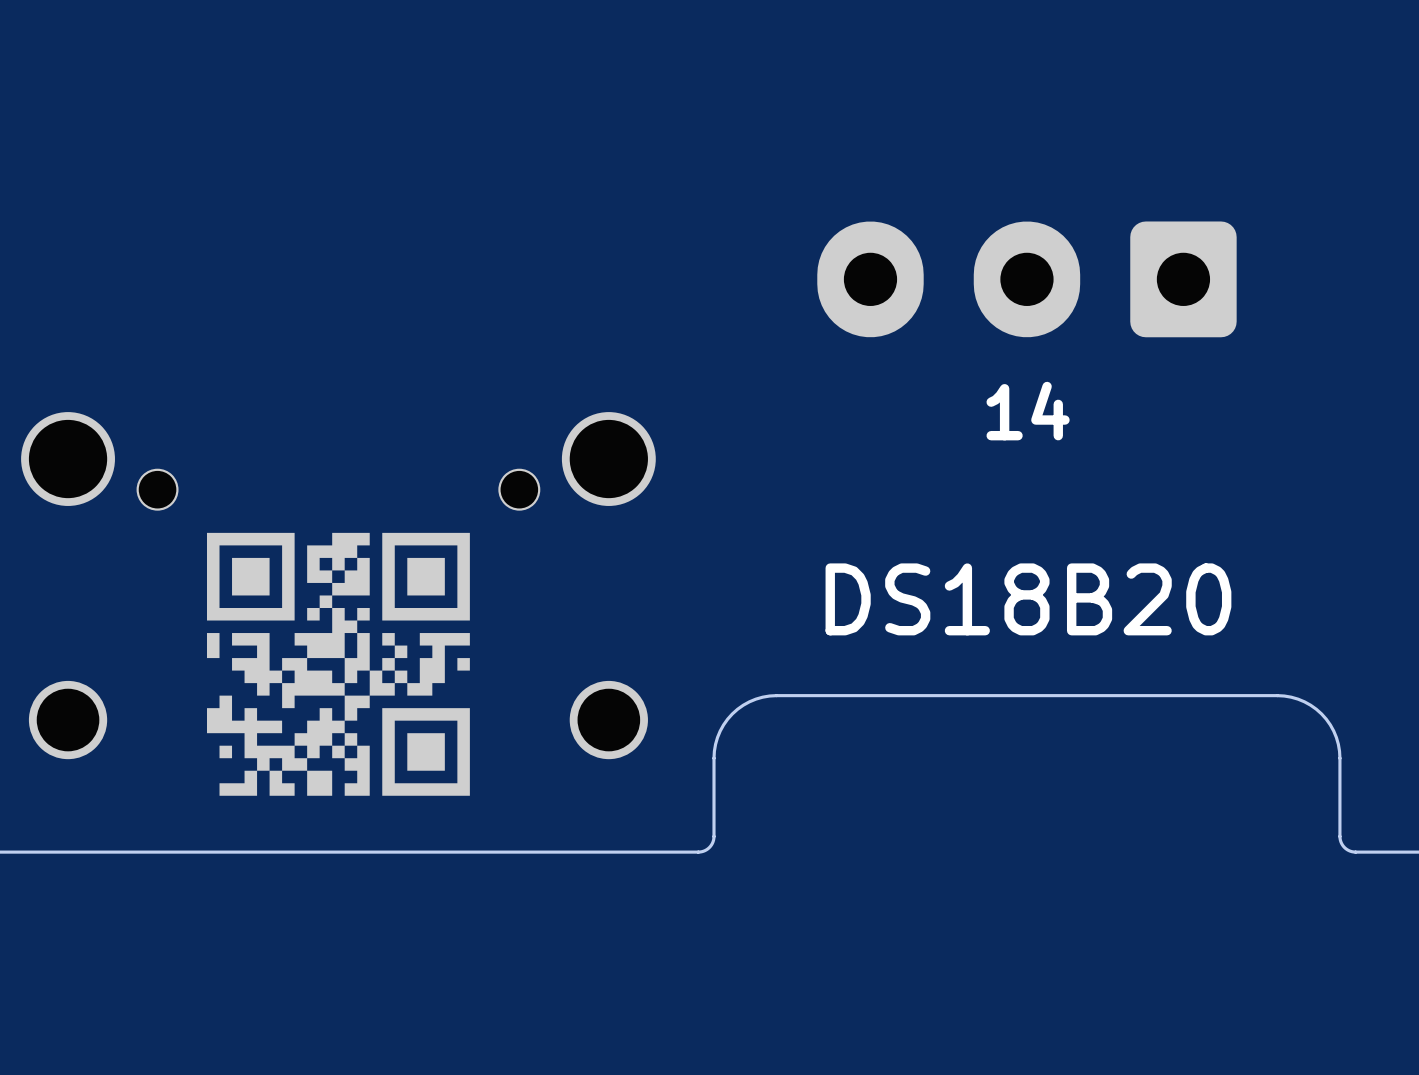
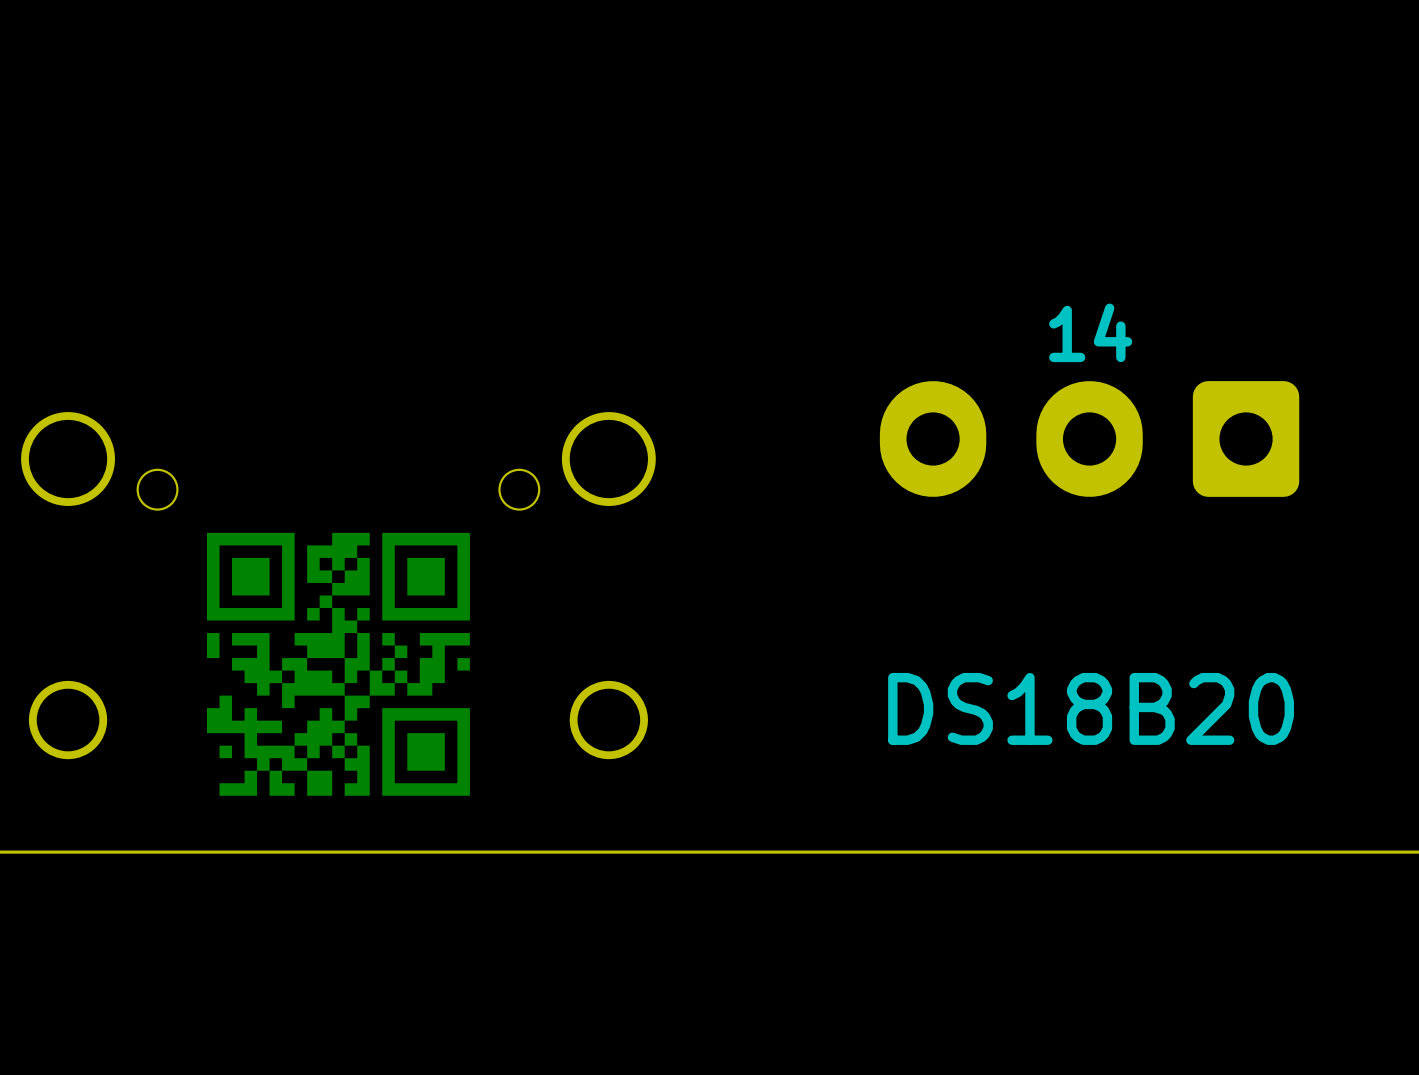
part position: (1026, 279) -> (1089, 438)
text position: 14 (1028, 411) -> 14 (1090, 332)
text position: DS18B20 (1028, 599) -> DS18B20 (1091, 708)
board edge: (1355, 852) (1345, 848) (1340, 839) (1339, 751) (1333, 731) (1321, 713) (1310, 705) (1291, 697) (1277, 695) (776, 695) (762, 697) (749, 701) (737, 709) (727, 719) (720, 731) (714, 751) (713, 839) (708, 848) (698, 852) -> (1355, 852) (698, 852)

